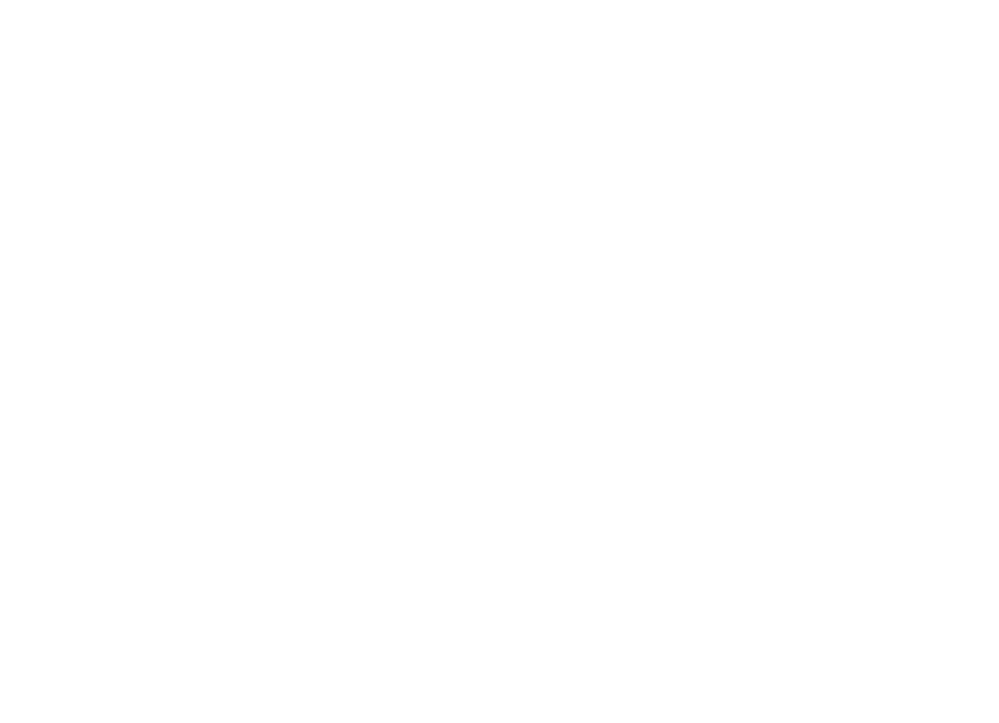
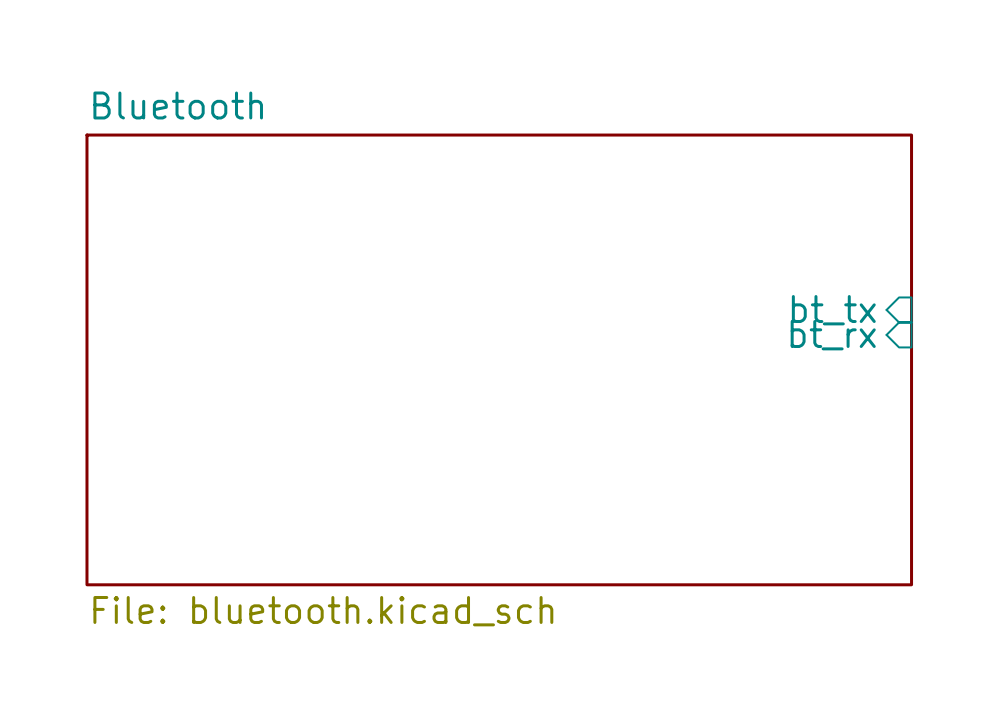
sheet pin: none -> bt_tx (833, 310)
sheet pin: none -> bt_rx (833, 335)
sheet Bluetooth: none -> File: bluetooth.kicad_sch (499, 359)

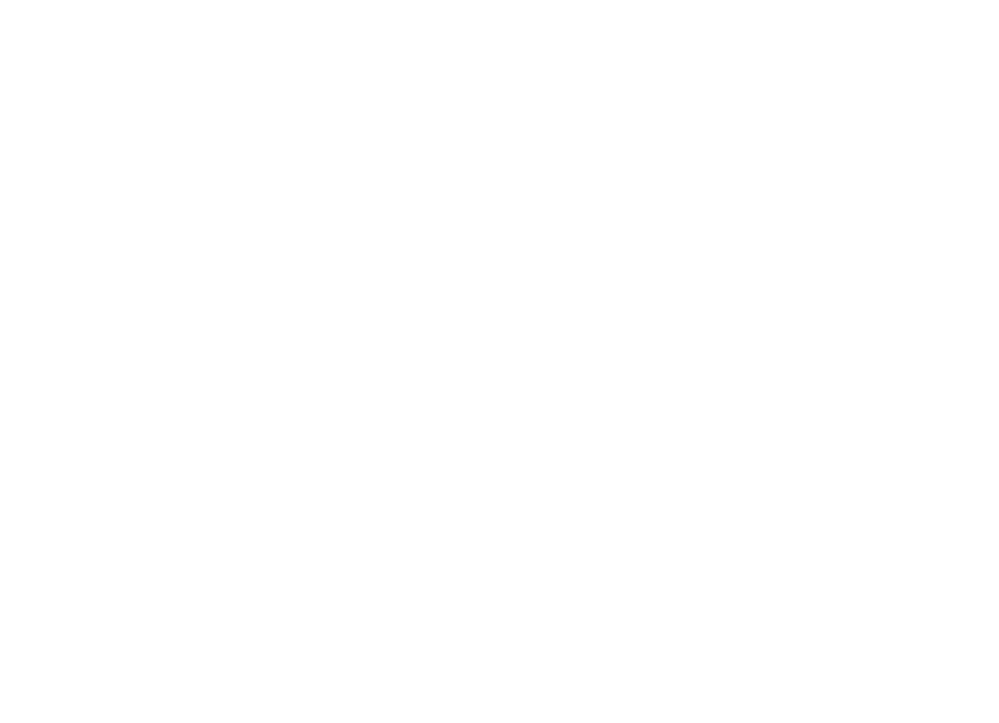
sheet pin: bt_tx (833, 310) -> none
sheet pin: bt_rx (833, 335) -> none
sheet Bluetooth: File: bluetooth.kicad_sch (499, 359) -> none

